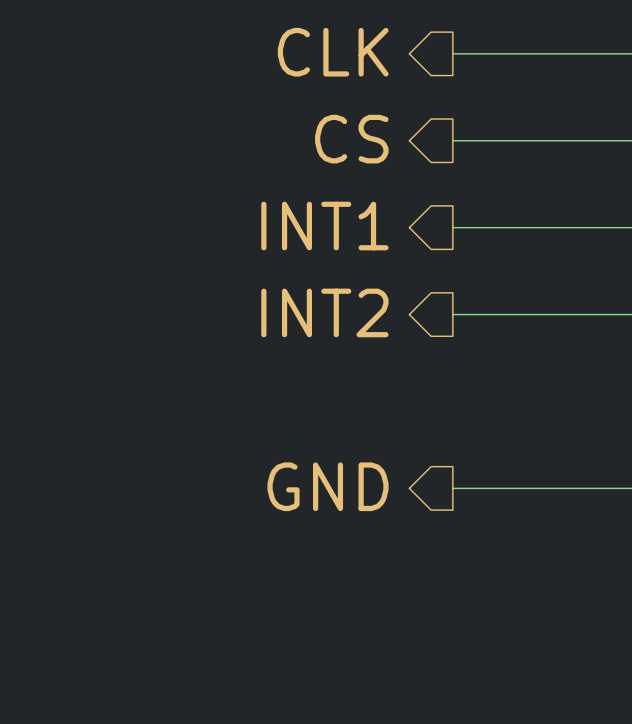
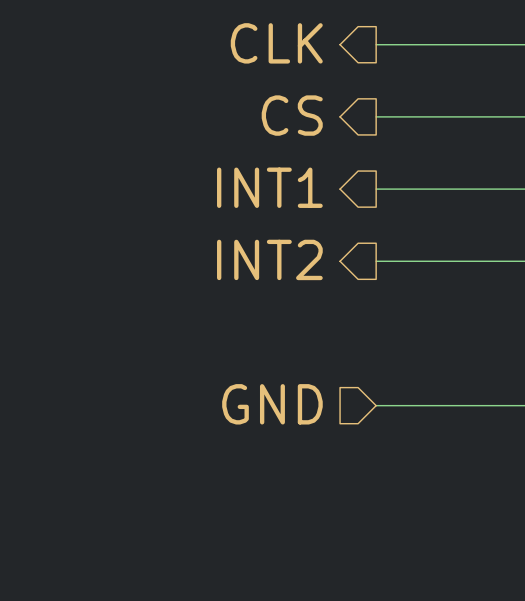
hierarchical label shape: output (328, 486) -> input (272, 404)

